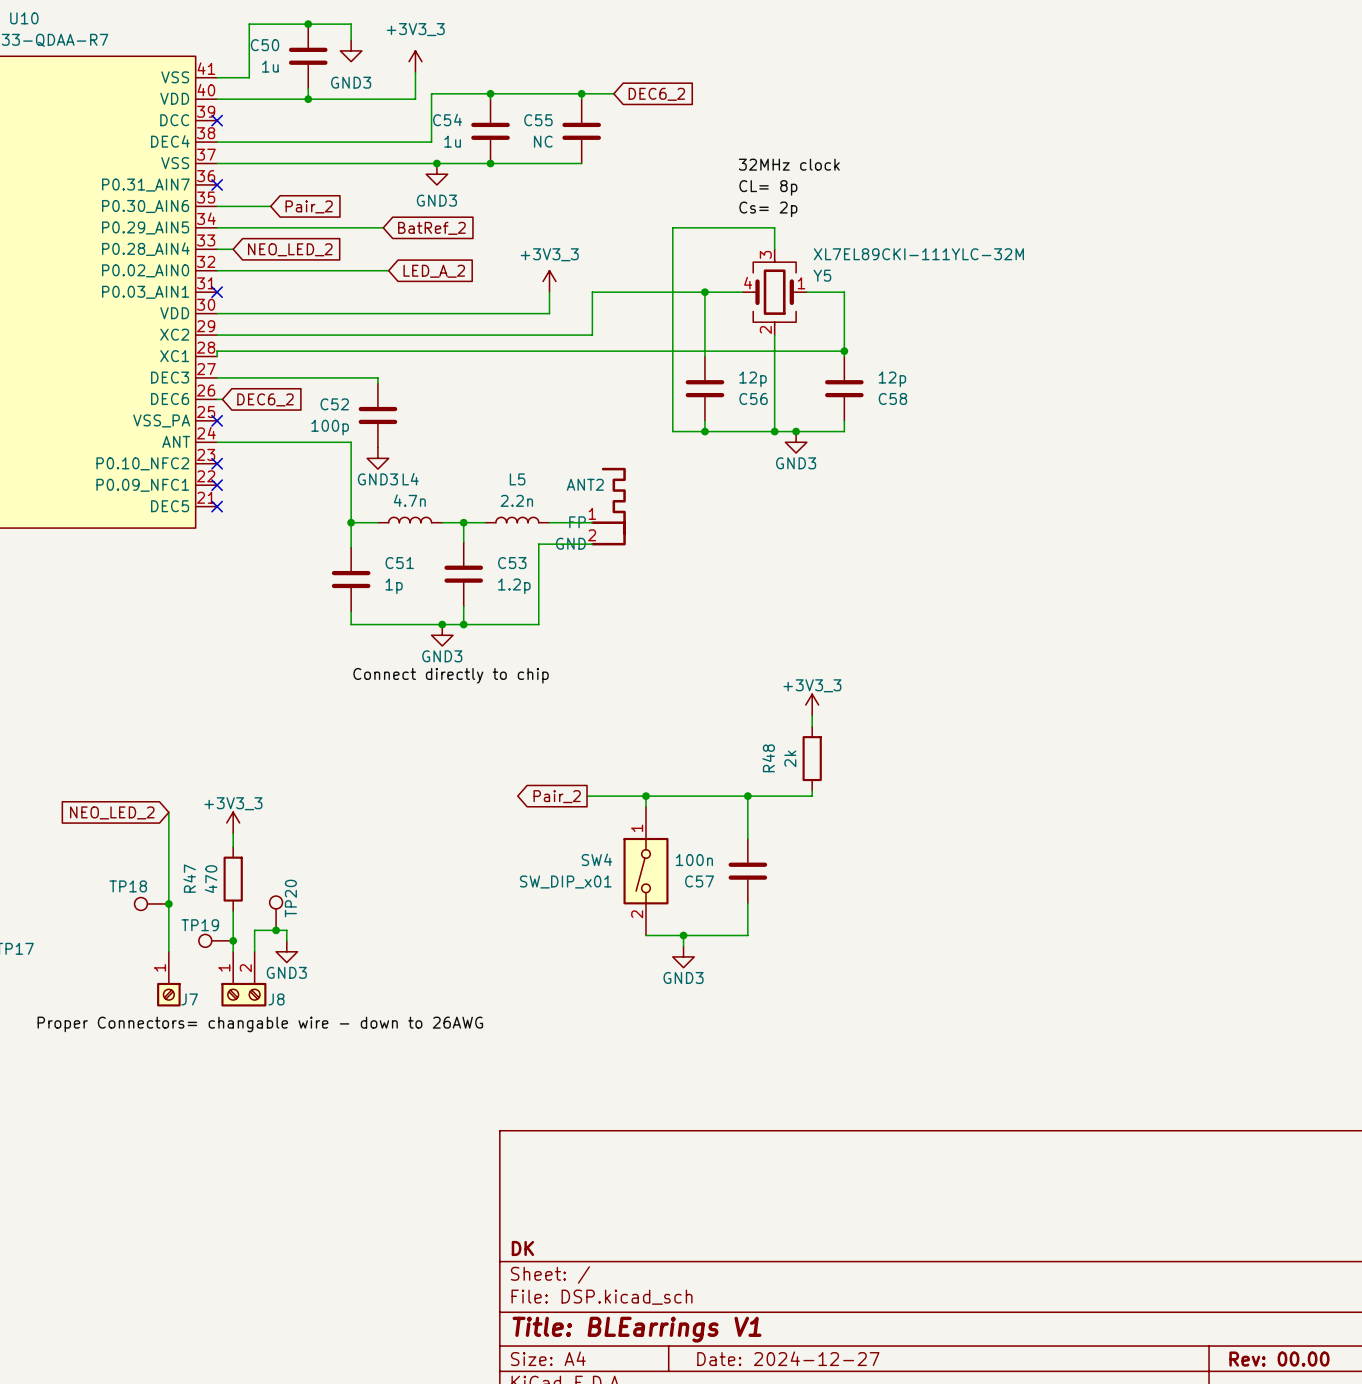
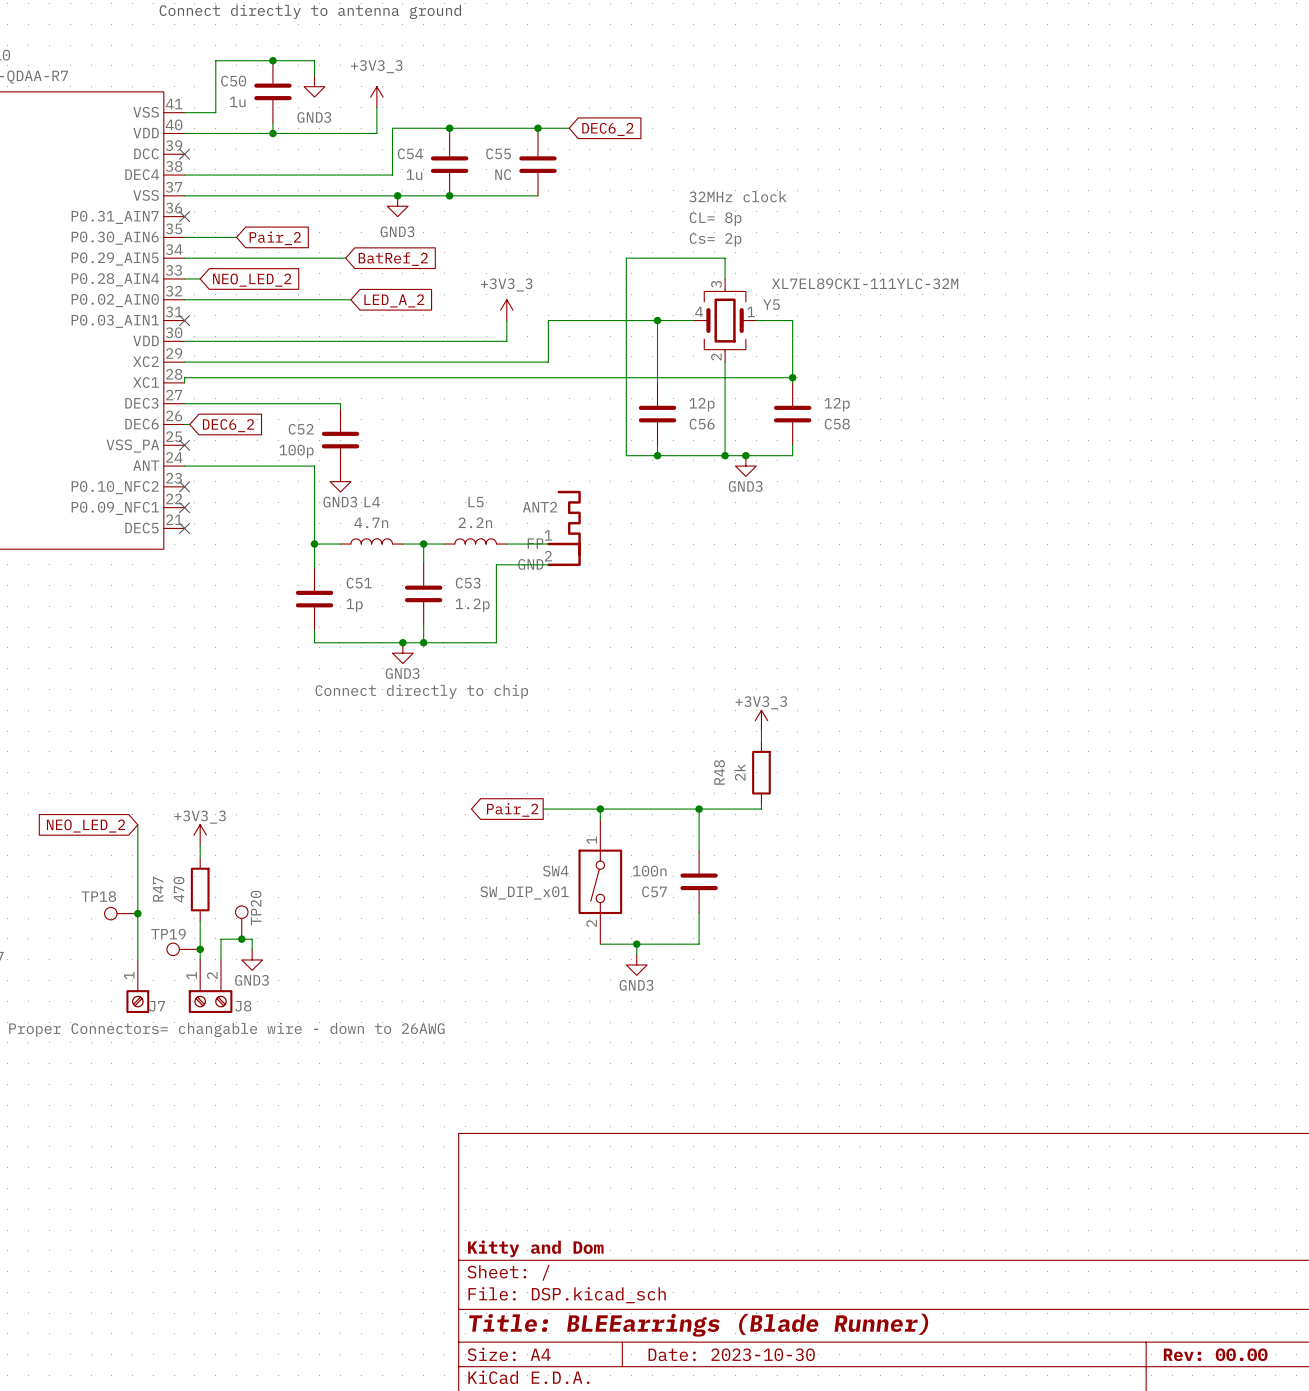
title block: DK (522, 1248) -> Kitty and Dom (535, 1248)
title block: Title: BLEarrings V1 (637, 1329) -> Title: BLEEarrings (Blade Runner) (698, 1325)
title block: Date: 2024-12-27 (788, 1358) -> Date: 2023-10-30 (731, 1354)

